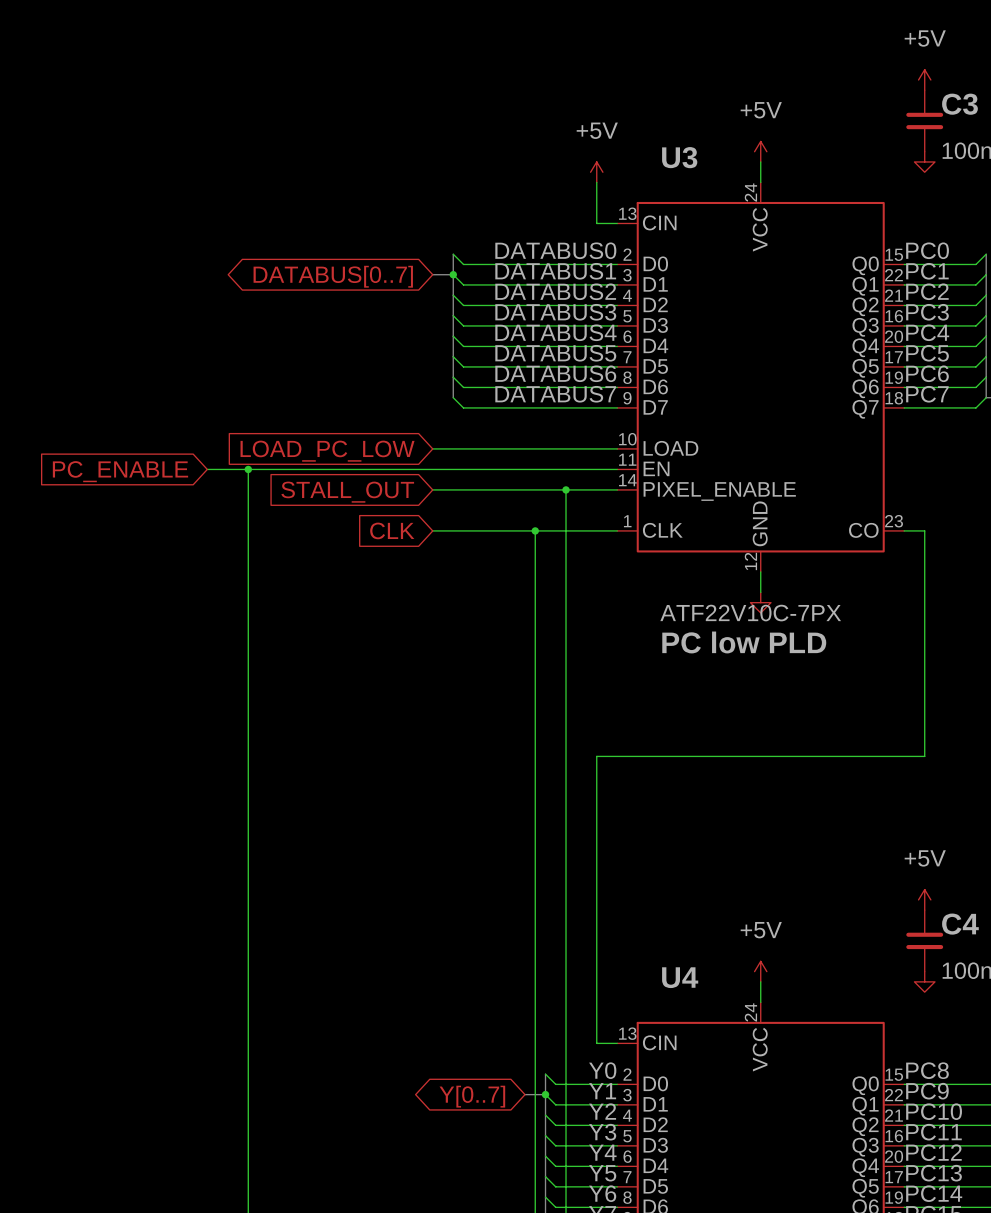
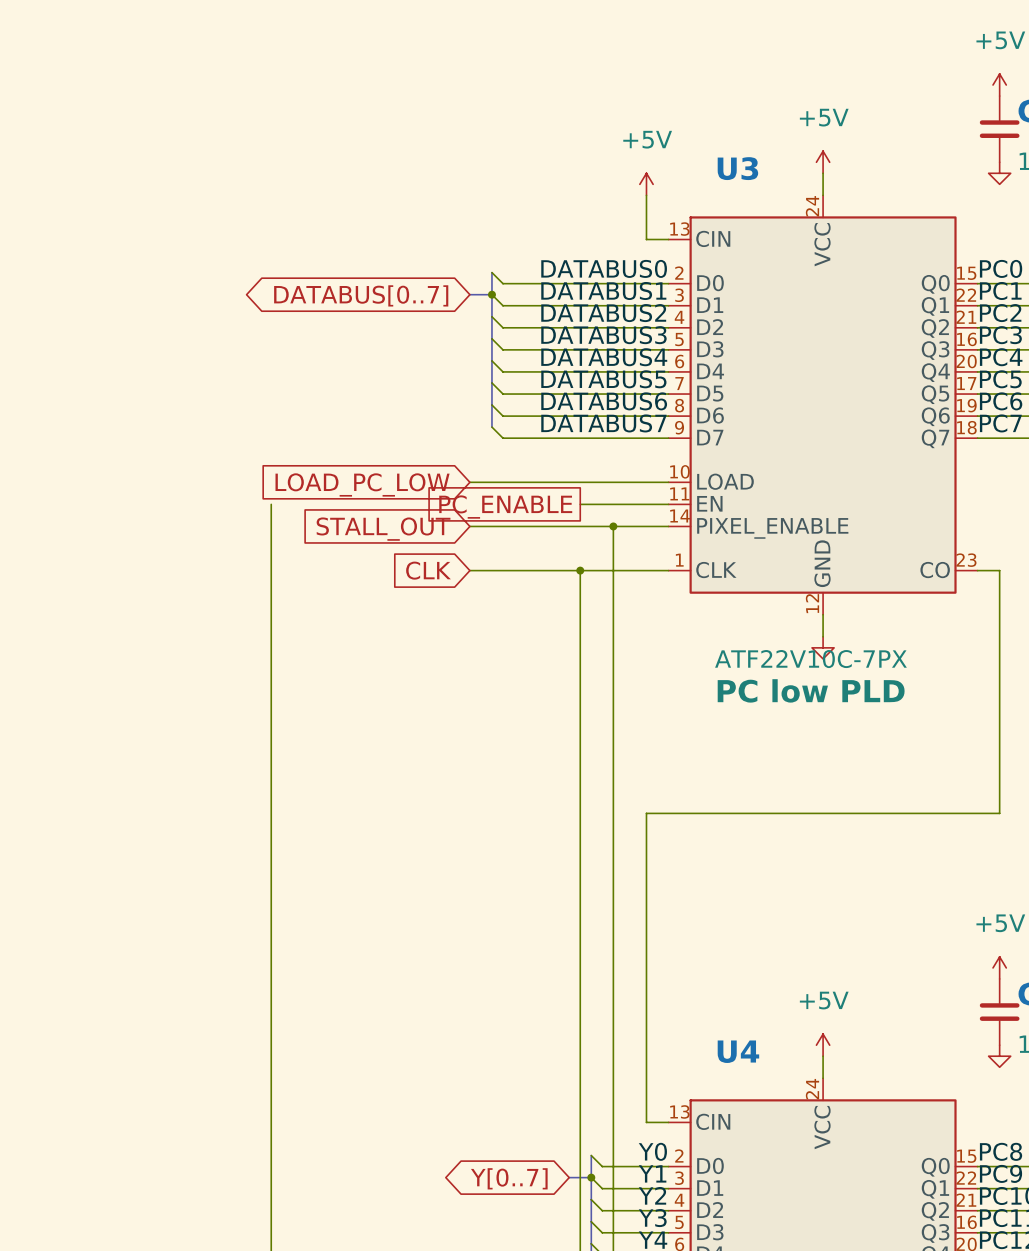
wire: (207, 469) (535, 469) -> none
junction: (248, 469) -> none
global label: PC_ENABLE (120, 471) -> none
global label: none -> PC_ENABLE (505, 507)

